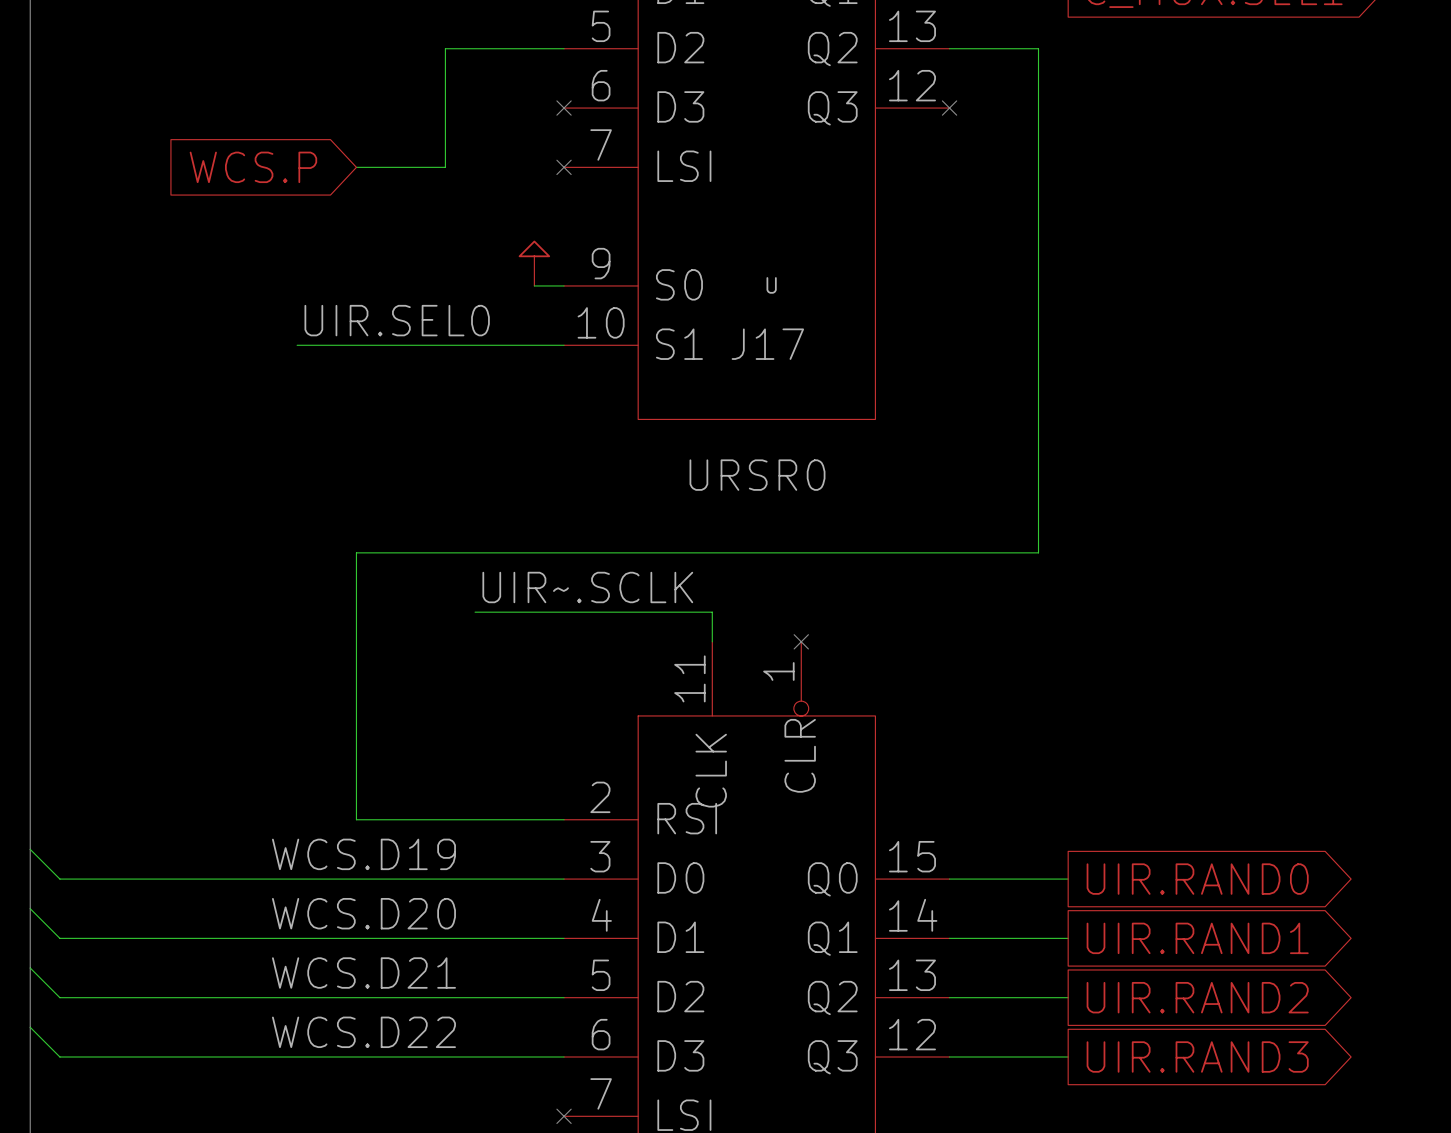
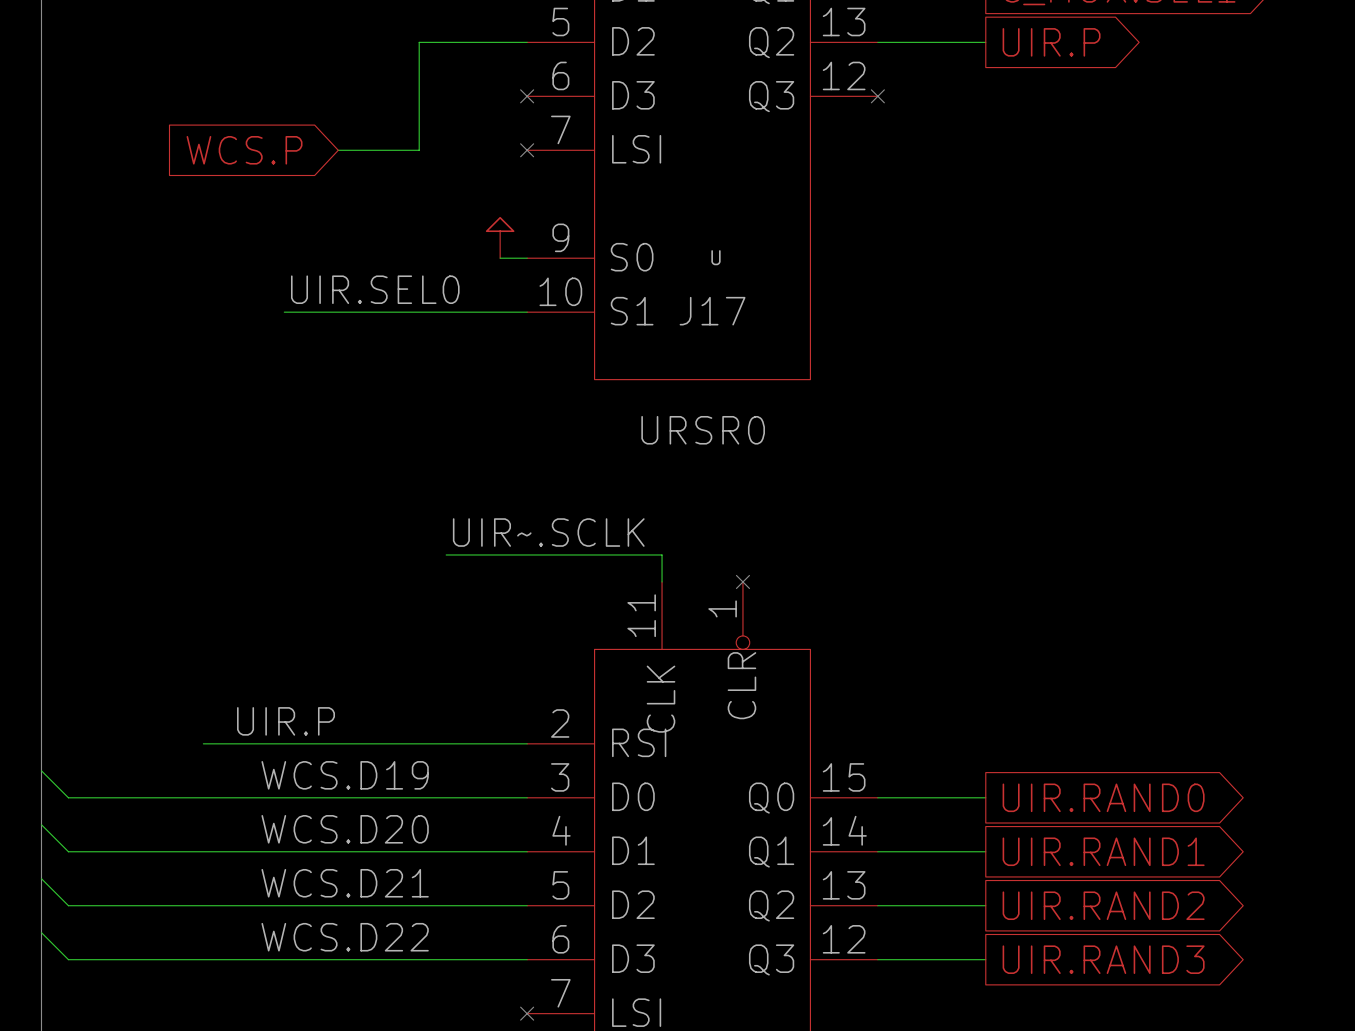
wire: (1038, 48) (1038, 552) (356, 552) (356, 819) -> (958, 42) (985, 42)
global label: none -> UIR.P (1051, 42)
label: none -> UIR.P (286, 721)
wire: none -> (203, 743) (338, 743)

